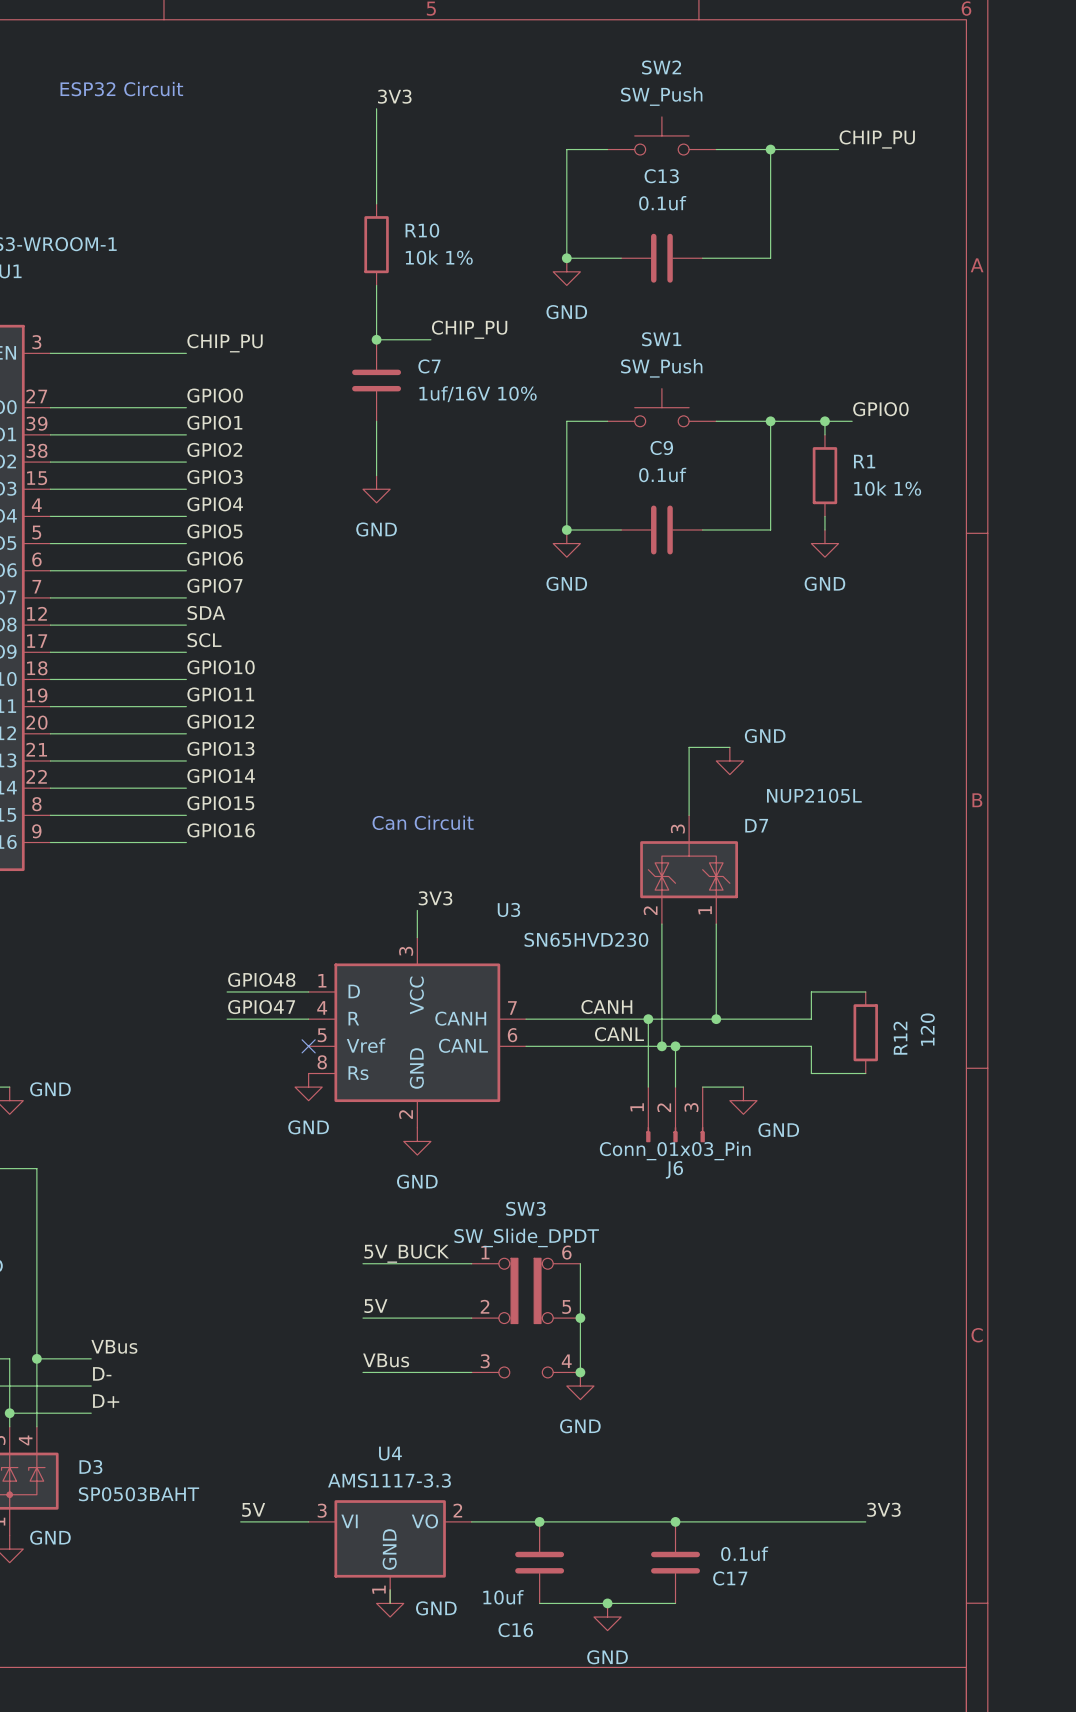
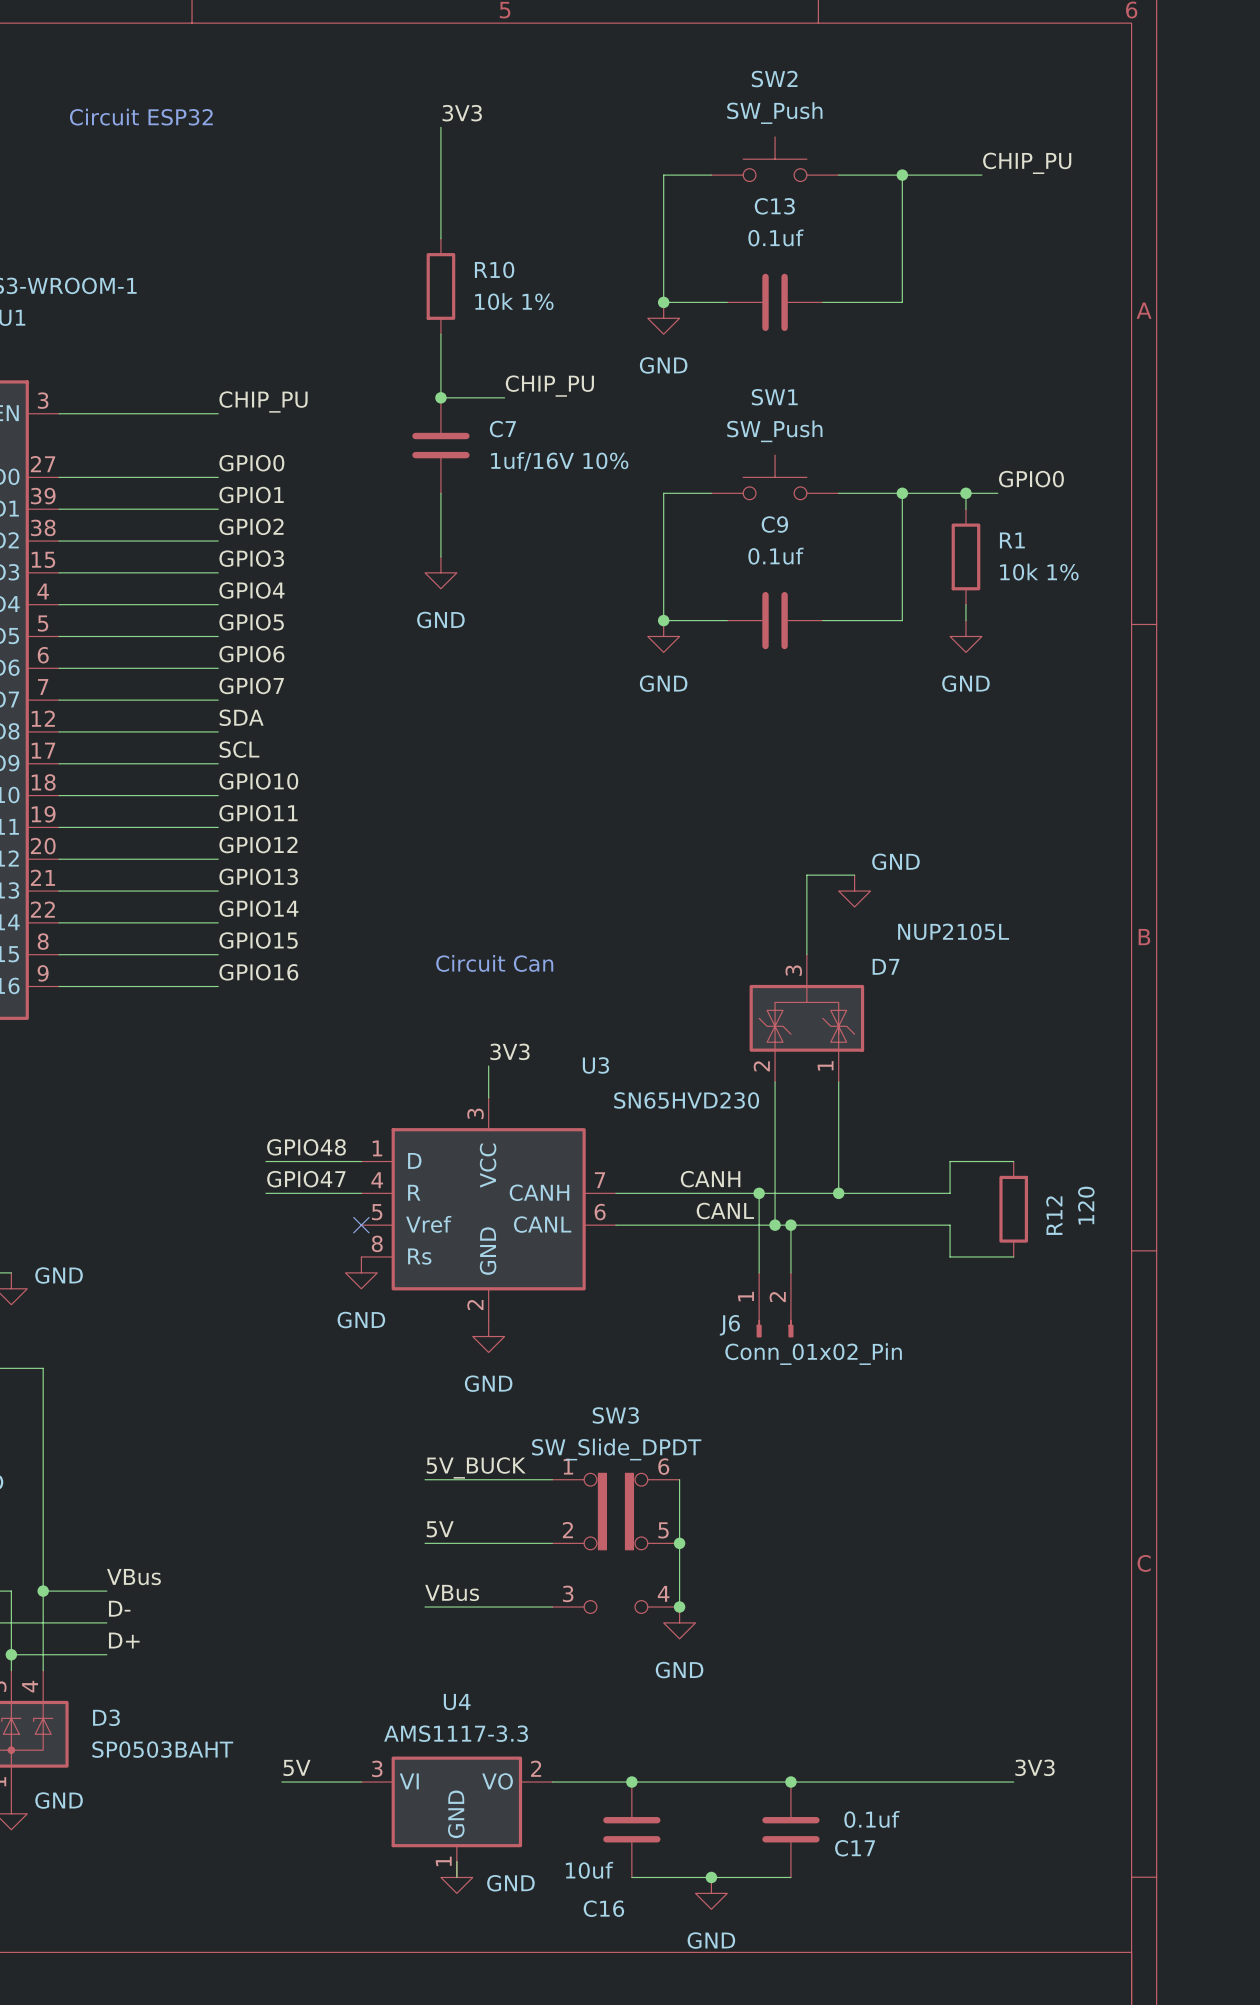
text: ESP32 Circuit (121, 89) -> none
text: none -> Circuit ESP32 (141, 117)
text: Can Circuit (423, 822) -> Circuit Can (494, 963)
J6 symbol: [646, 1087, 705, 1143] -> [756, 1272, 794, 1338]
wire: (702, 1087) (743, 1087) -> none
power symbol: GND (743, 1100) -> none
J6 value: Conn_01x03_Pin (675, 1151) -> Conn_01x02_Pin (813, 1354)
J6 name position: J6 (674, 1169) -> J6 (729, 1325)

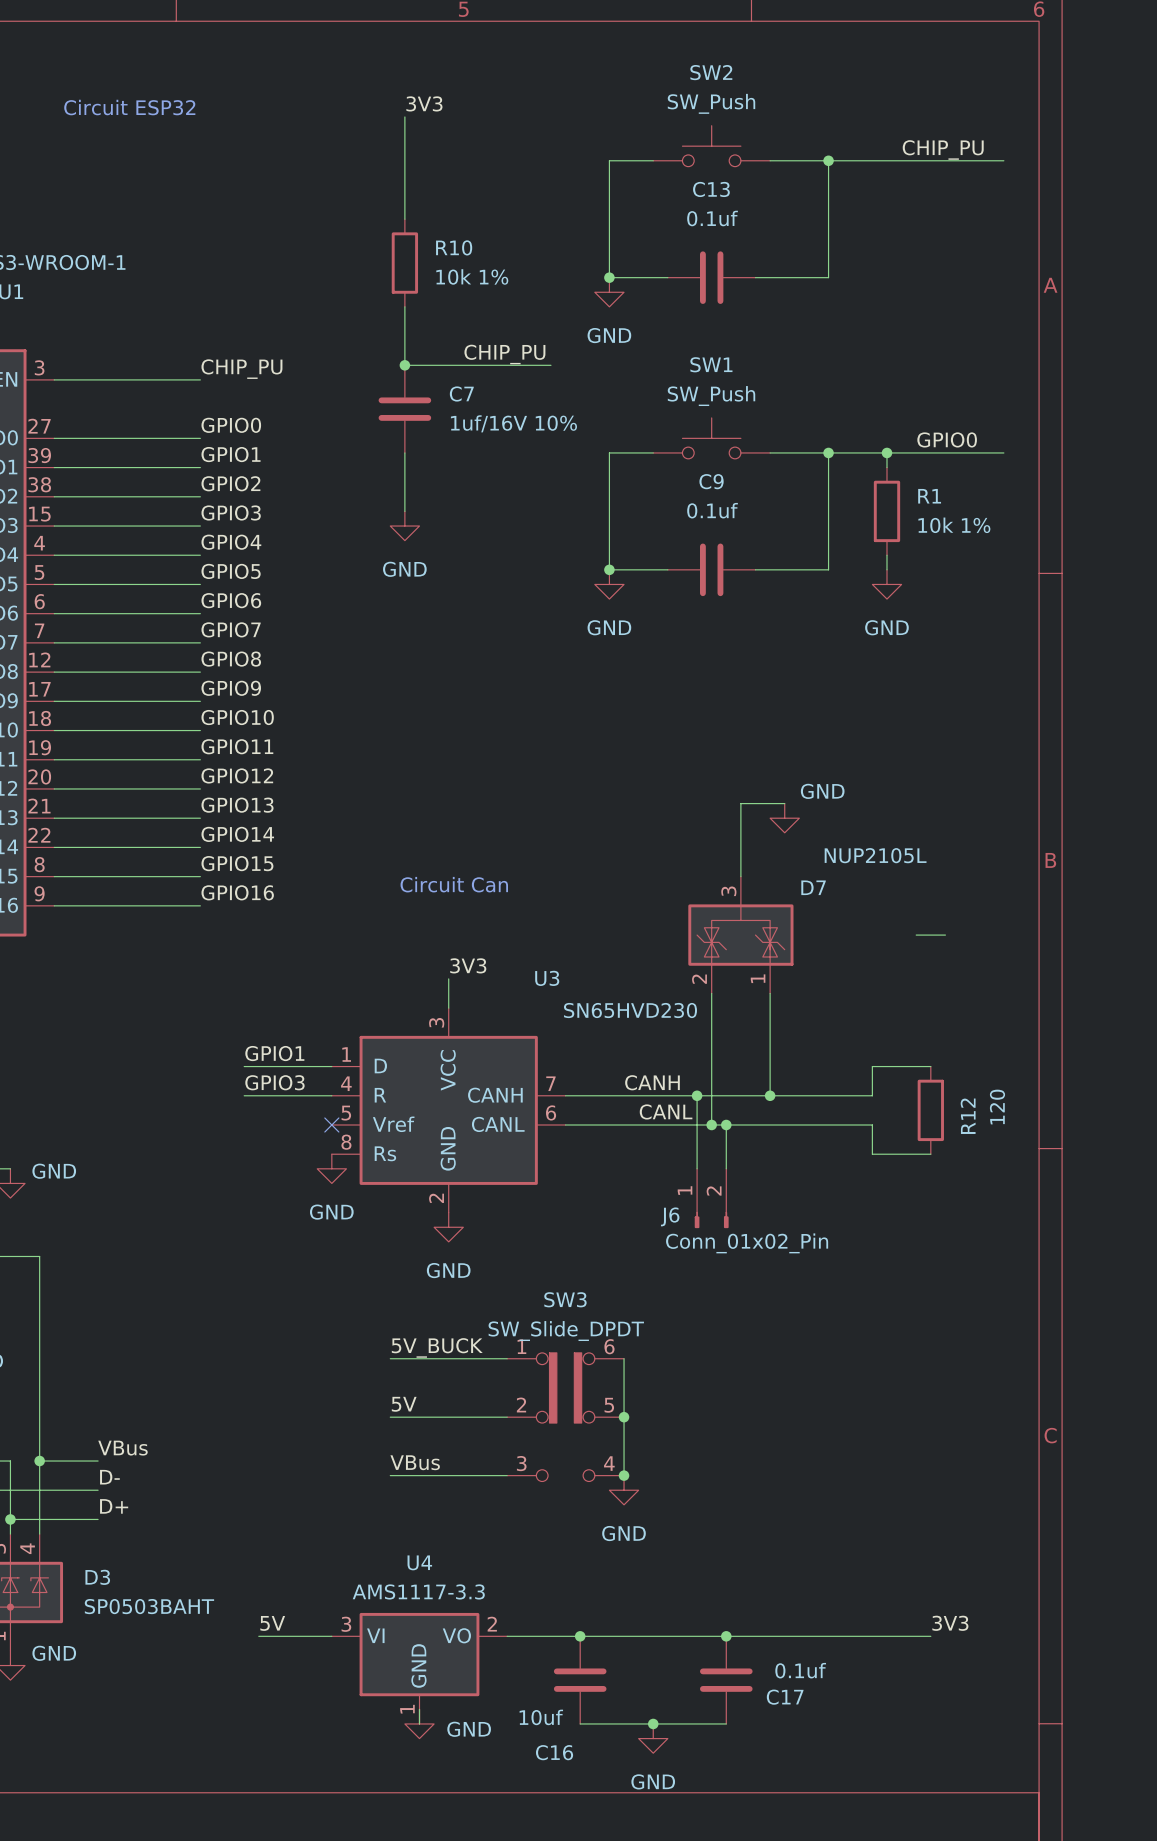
wire: none -> (901, 160) (1003, 160)
wire: none -> (463, 365) (550, 365)
wire: none -> (916, 452) (1003, 452)
label: SDA (241, 717) -> GPIO8 (231, 659)
label: SCL (239, 749) -> GPIO9 (231, 688)
wire: none -> (916, 935) (945, 935)
label: GPIO48 (306, 1147) -> GPIO1 (274, 1053)
label: GPIO47 (306, 1179) -> GPIO3 (274, 1082)

